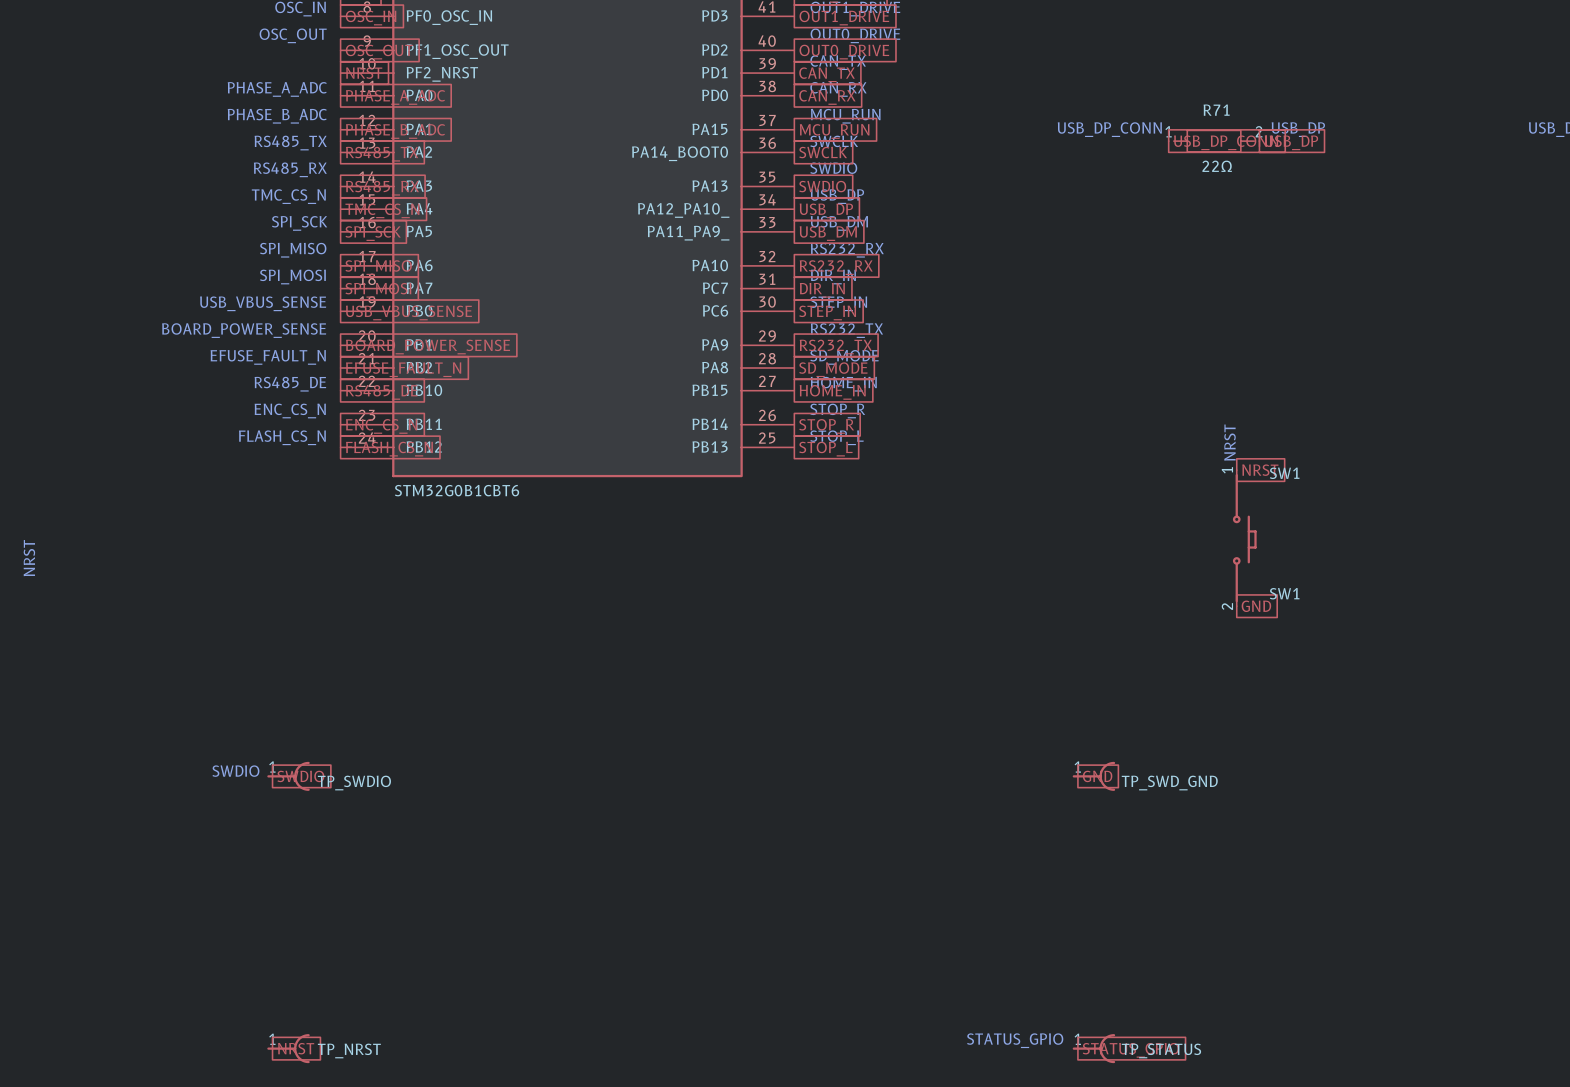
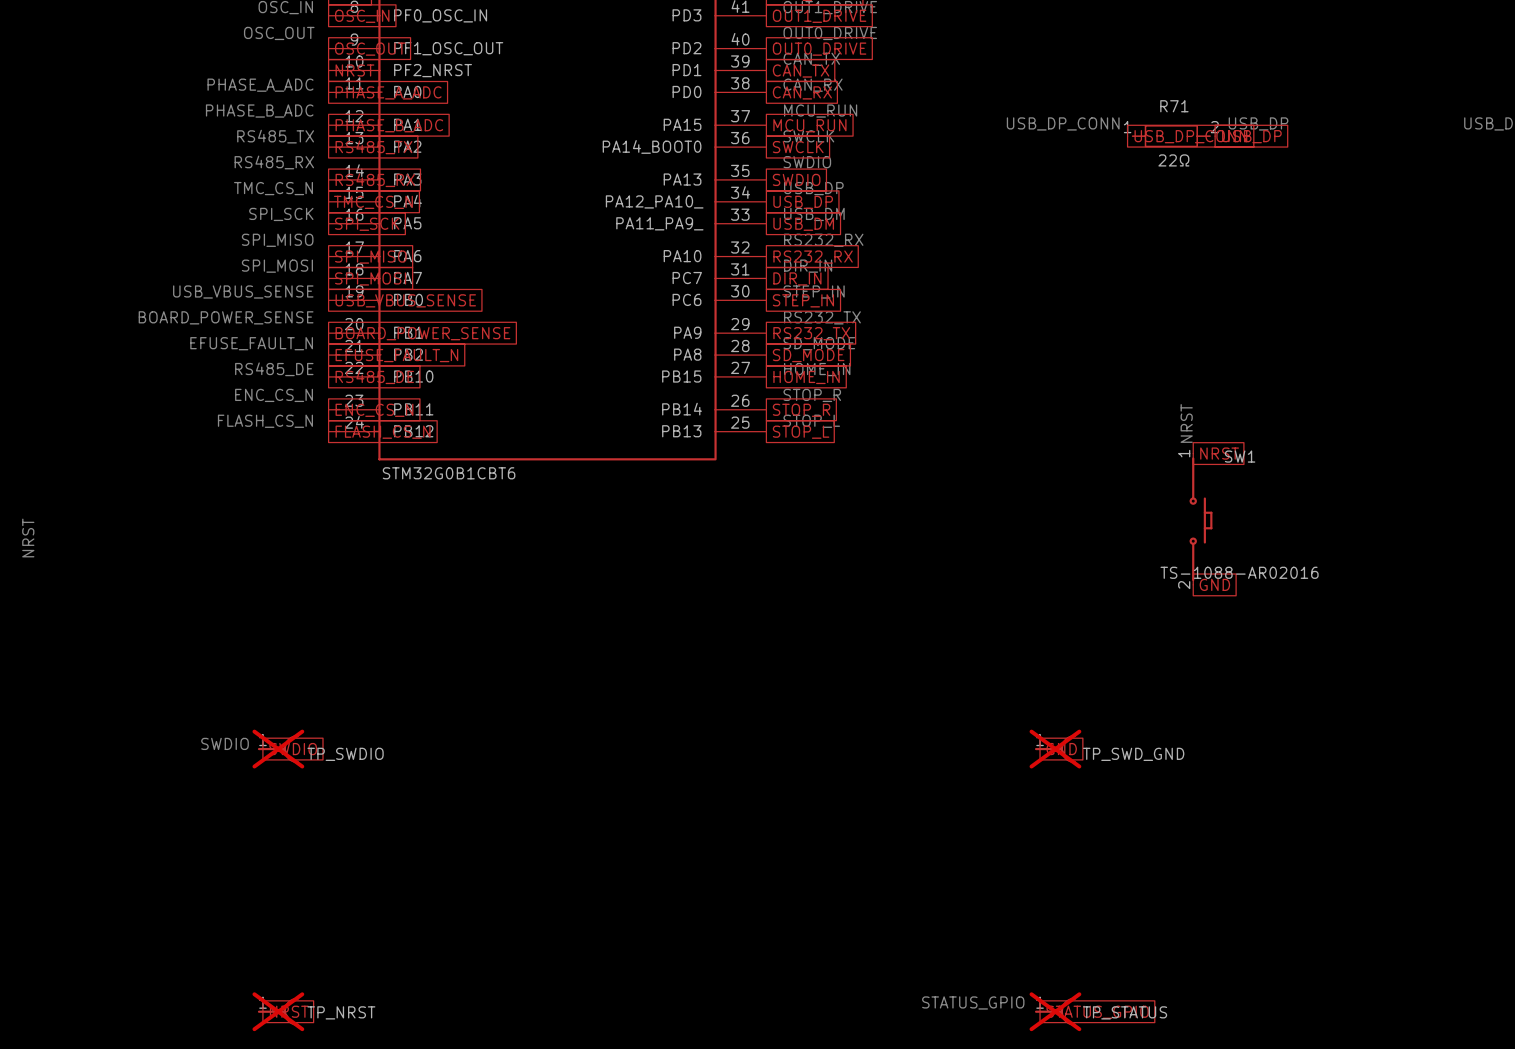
SW1 value: SW1 (1284, 593) -> TS-1088-AR02016 (1239, 572)
TP_SWDIO do-not-place cross: none -> (278, 749)
TP_SWD_GND do-not-place cross: none -> (1055, 749)
TP_NRST do-not-place cross: none -> (278, 1011)
TP_STATUS do-not-place cross: none -> (1055, 1011)

